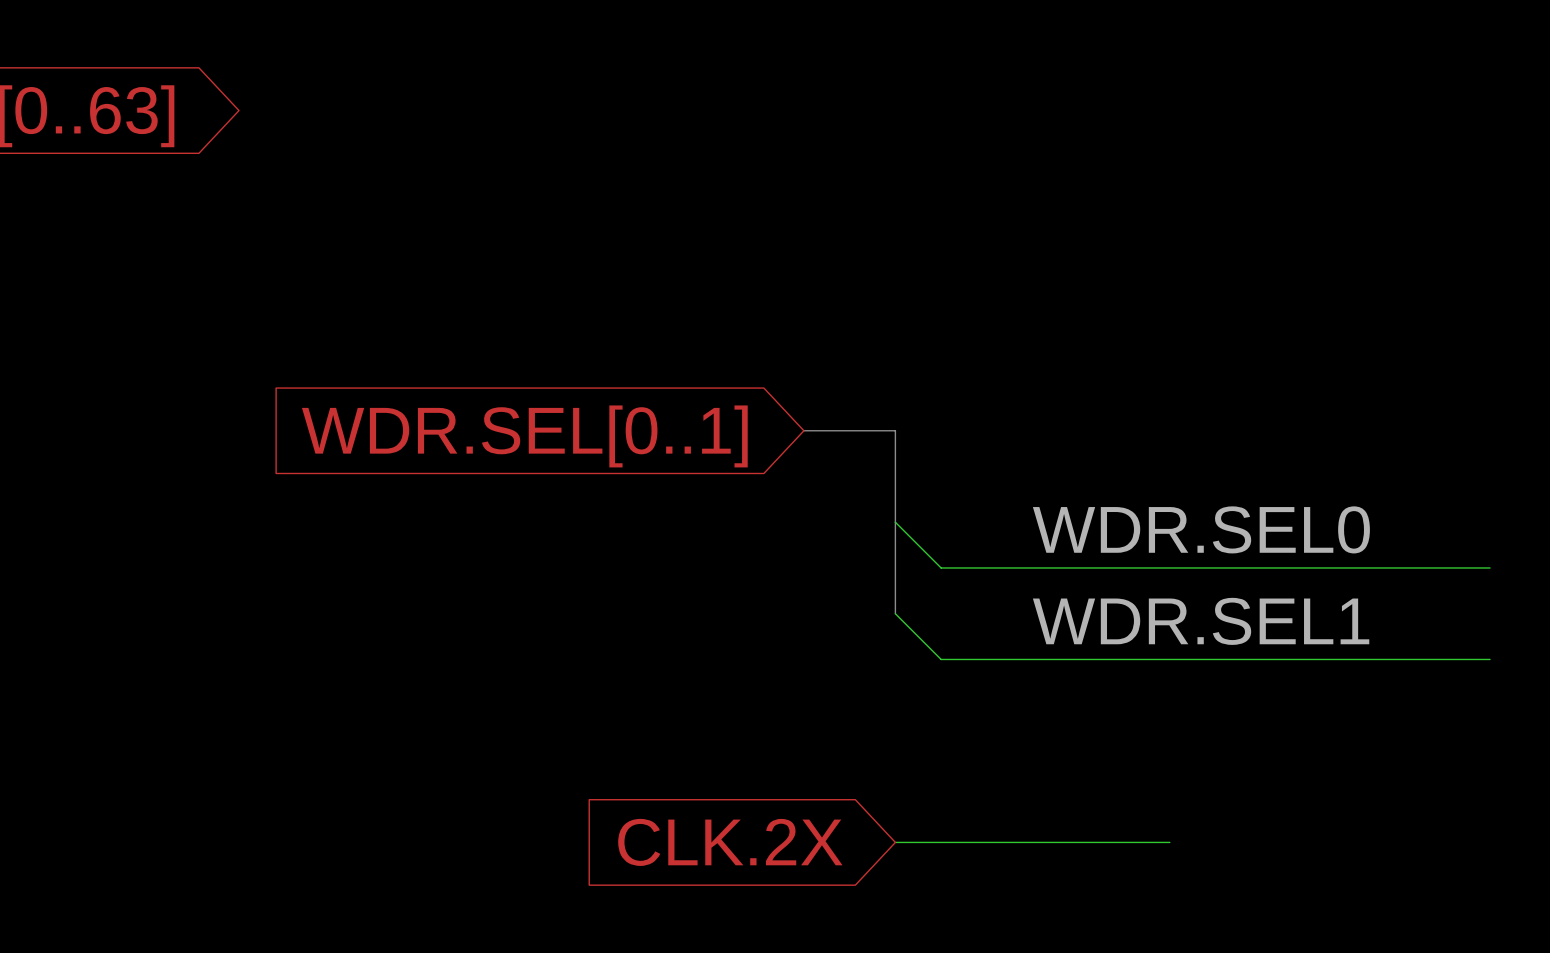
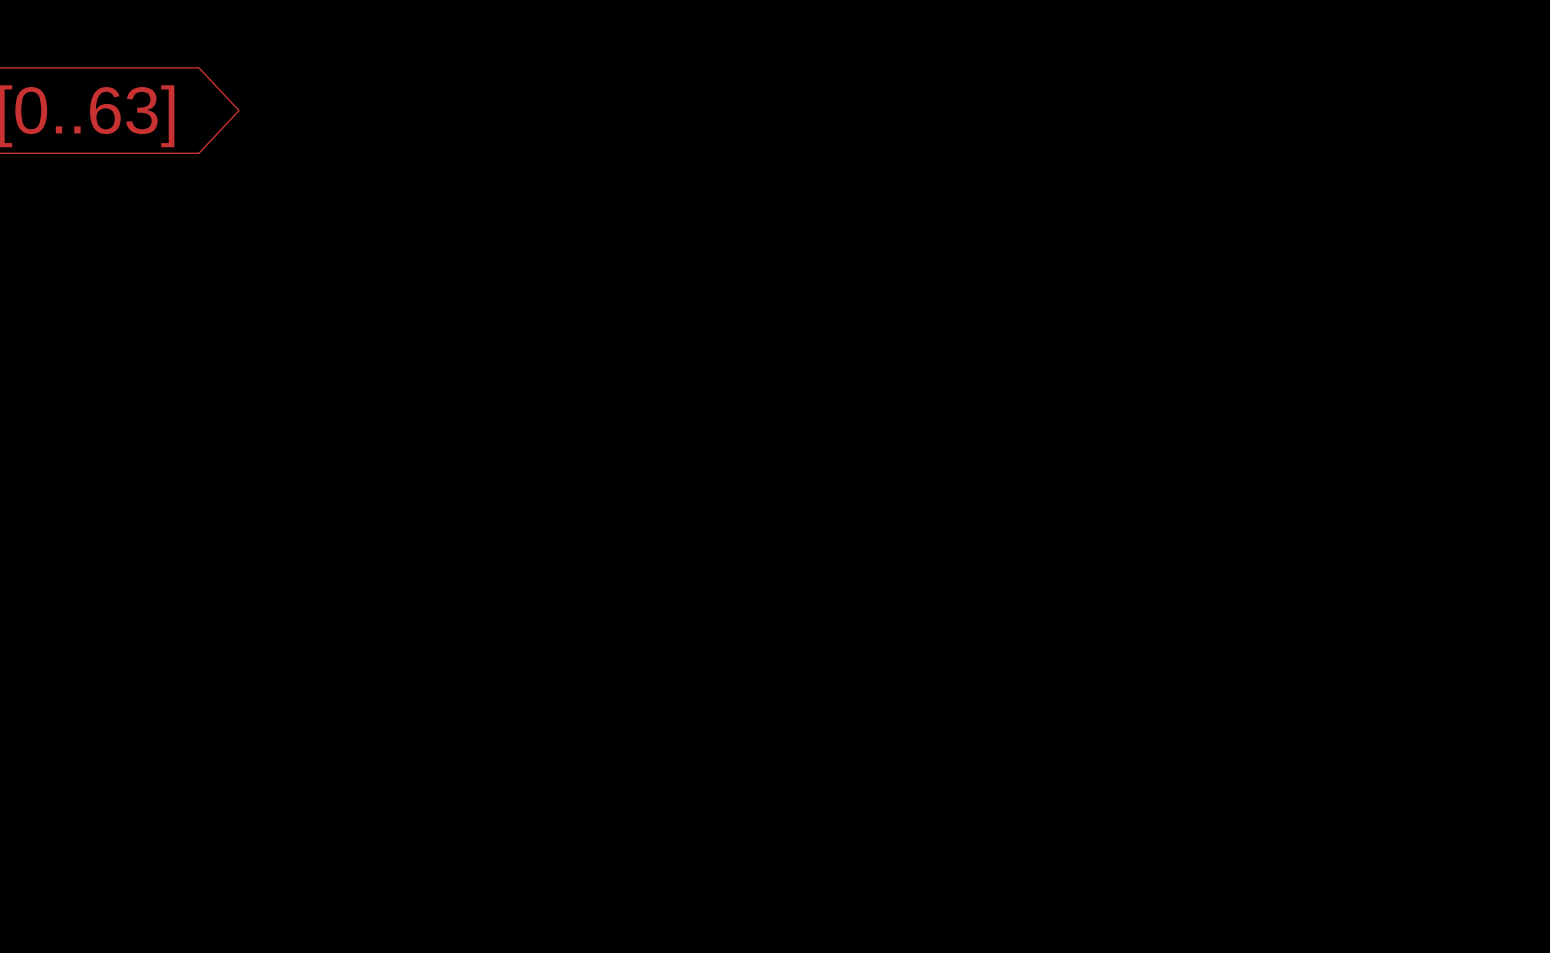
bus: (803, 430) (895, 430) (895, 613) -> none
global label: WDR.SEL[0..1] (524, 436) -> none
wire: (895, 522) (941, 567) (1490, 567) -> none
label: WDR.SEL0 (1201, 529) -> none
wire: (895, 613) (941, 659) (1490, 659) -> none
label: WDR.SEL1 (1201, 621) -> none
global label: CLK.2X (730, 842) -> none
wire: (895, 842) (1169, 842) -> none

